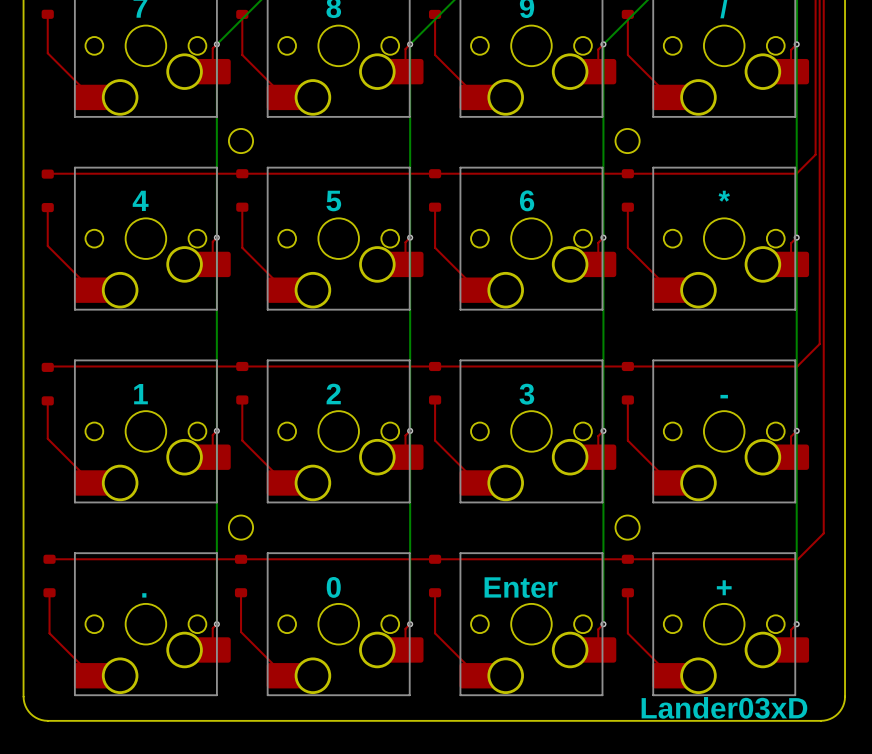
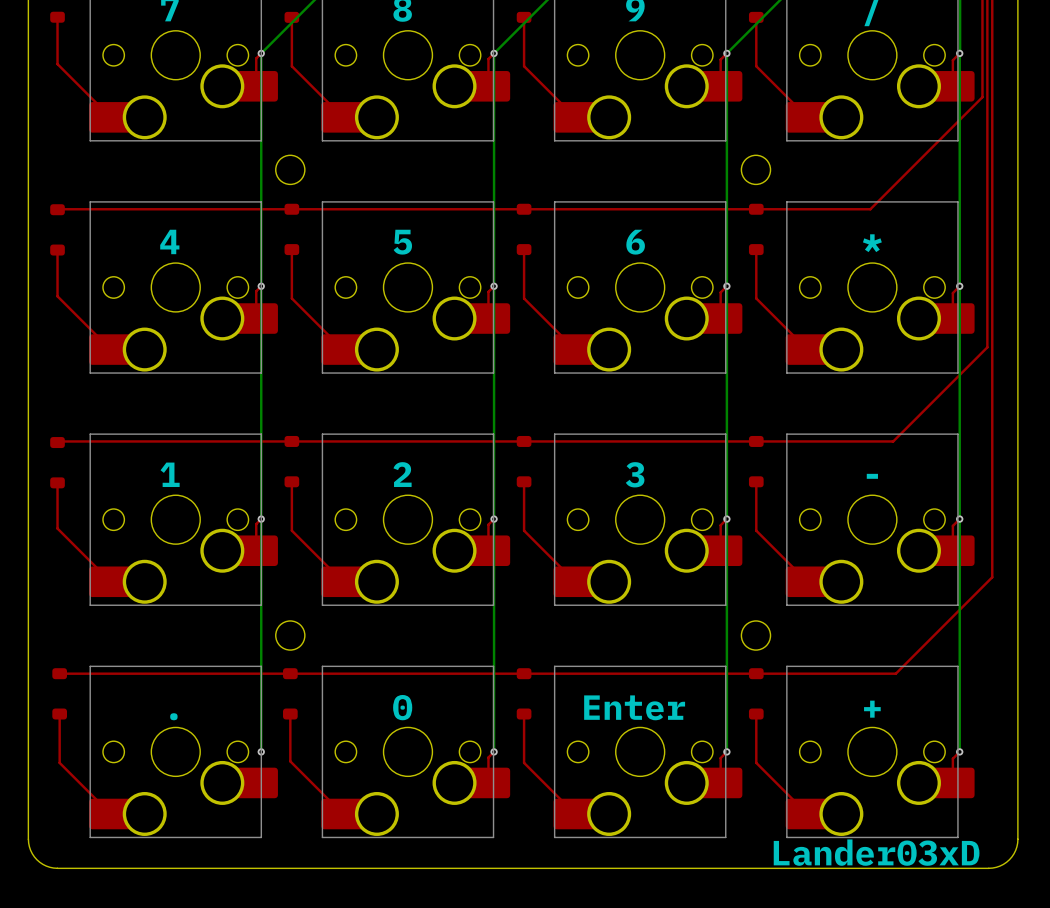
top track: (815, 80) (815, 154) (796, 173) (722, 173) -> (982, 97) (870, 209)
top track: (819, 288) (819, 344) (797, 366) (741, 366) -> (987, 347) (892, 441)
top track: (823, 479) (823, 533) (797, 559) (743, 559) -> (992, 577) (895, 673)
top track: (216, 624) (212, 628) (212, 649) -> none

